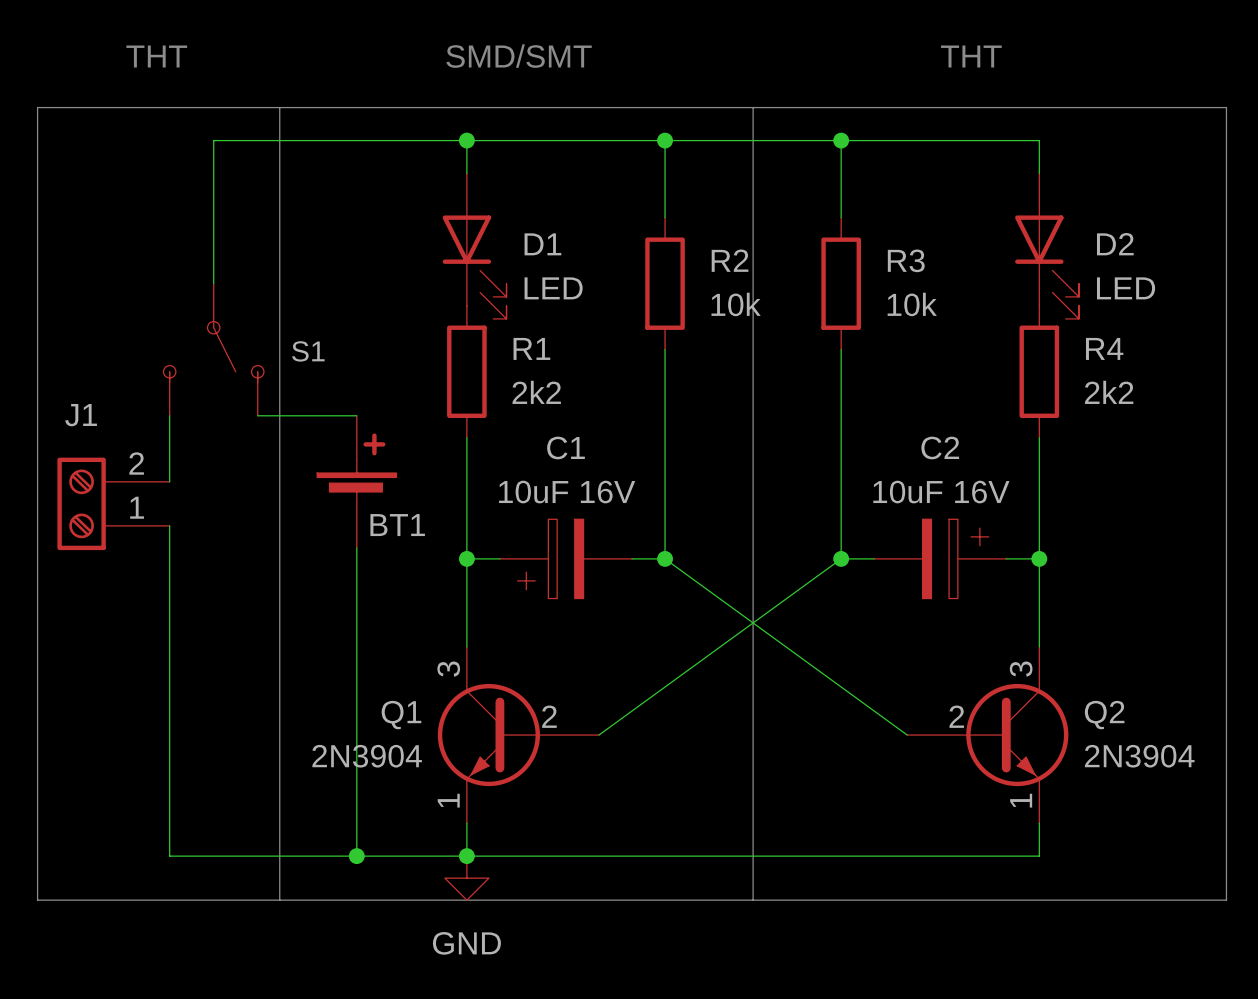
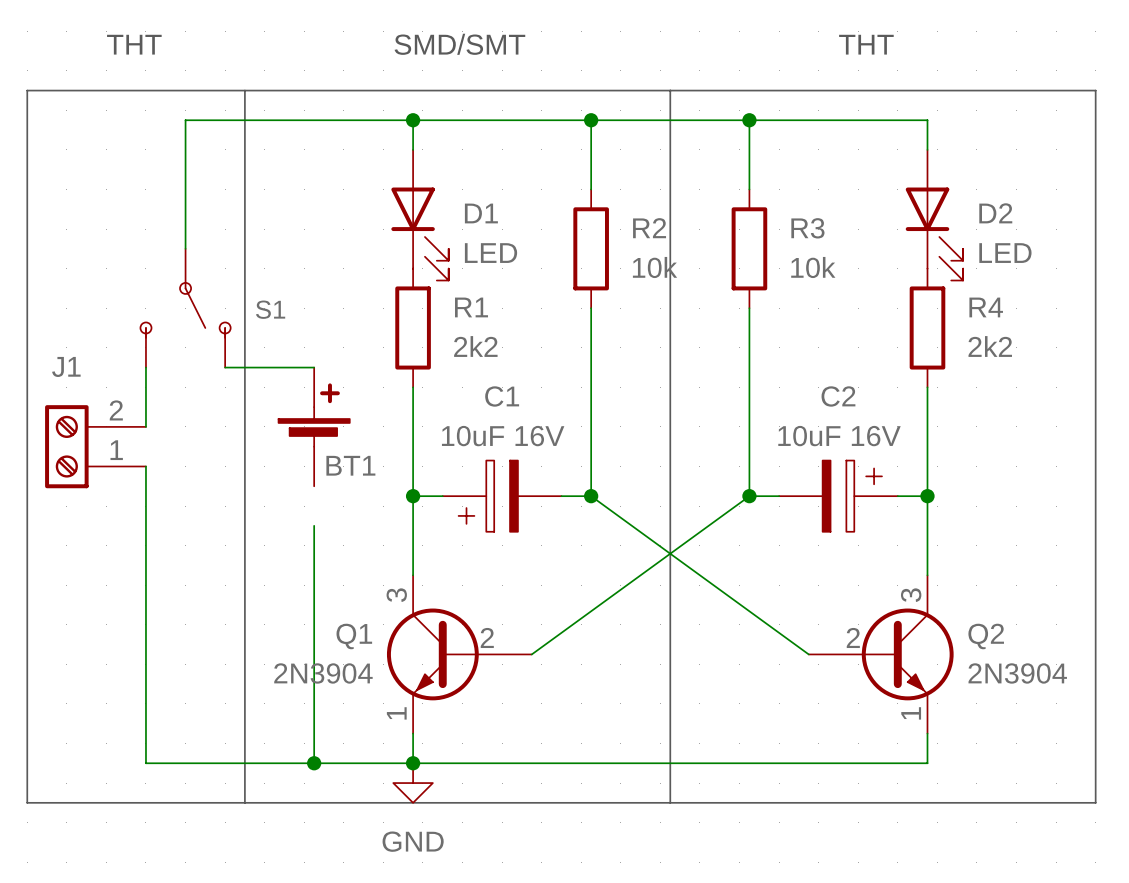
wire: (356, 547) (356, 591) -> none

